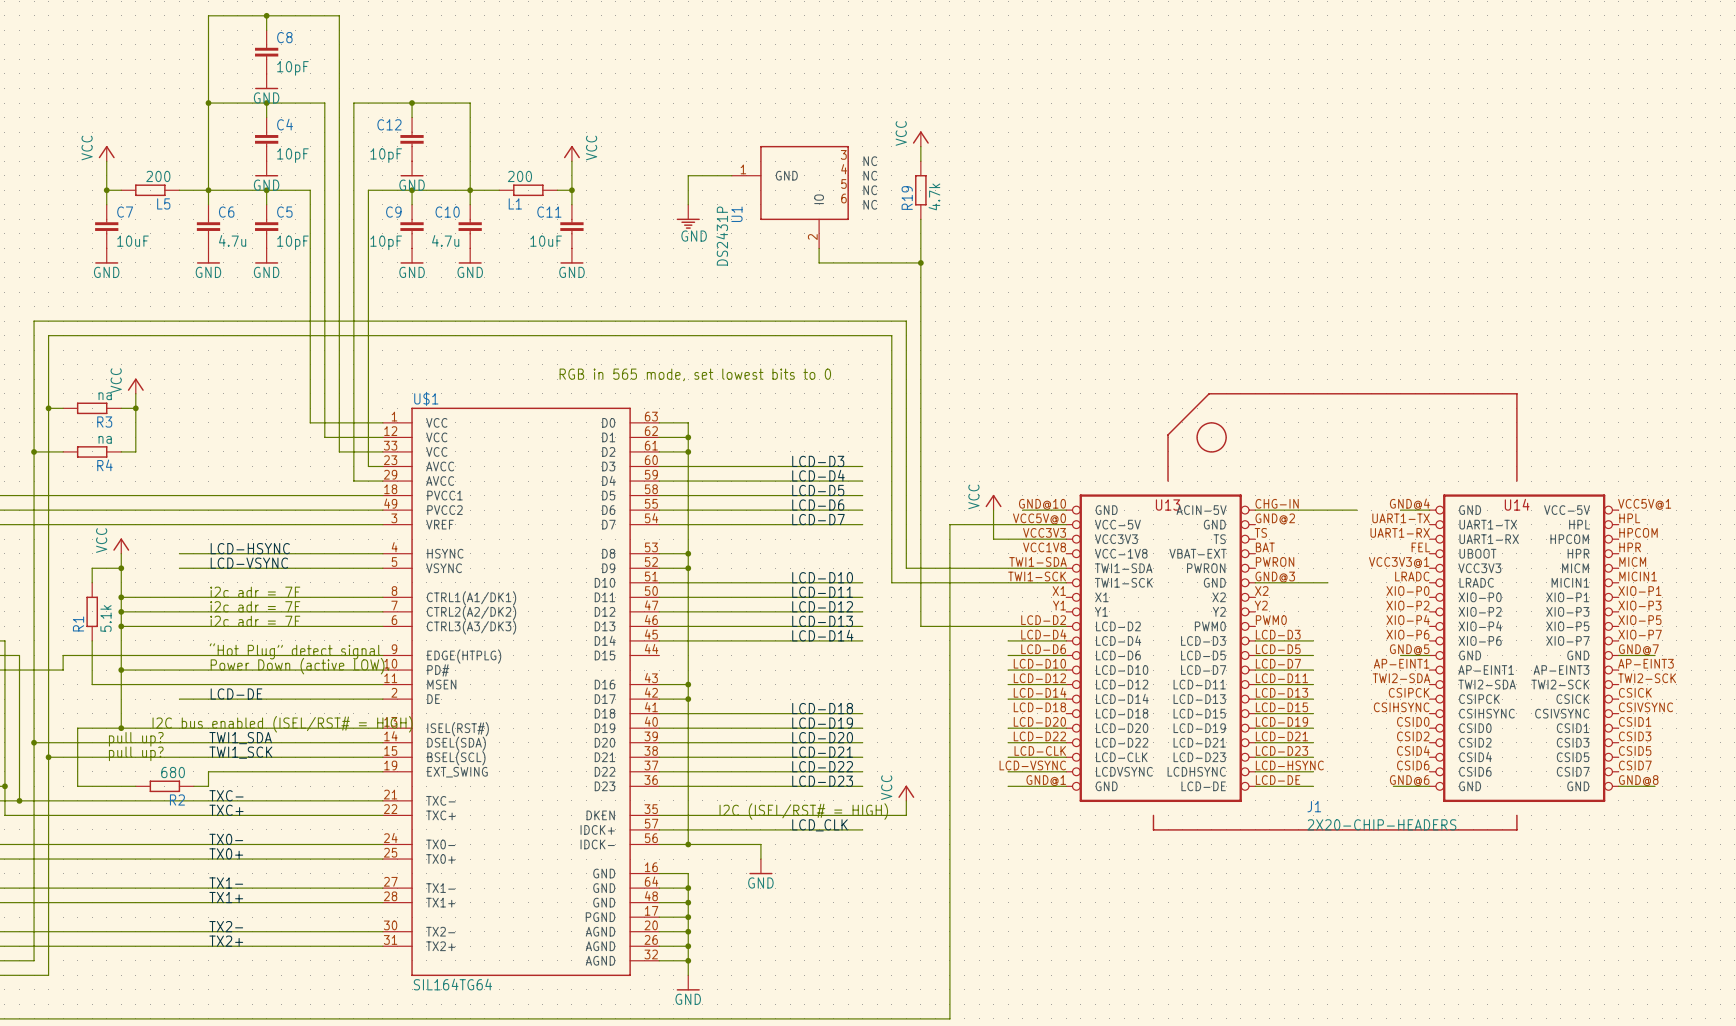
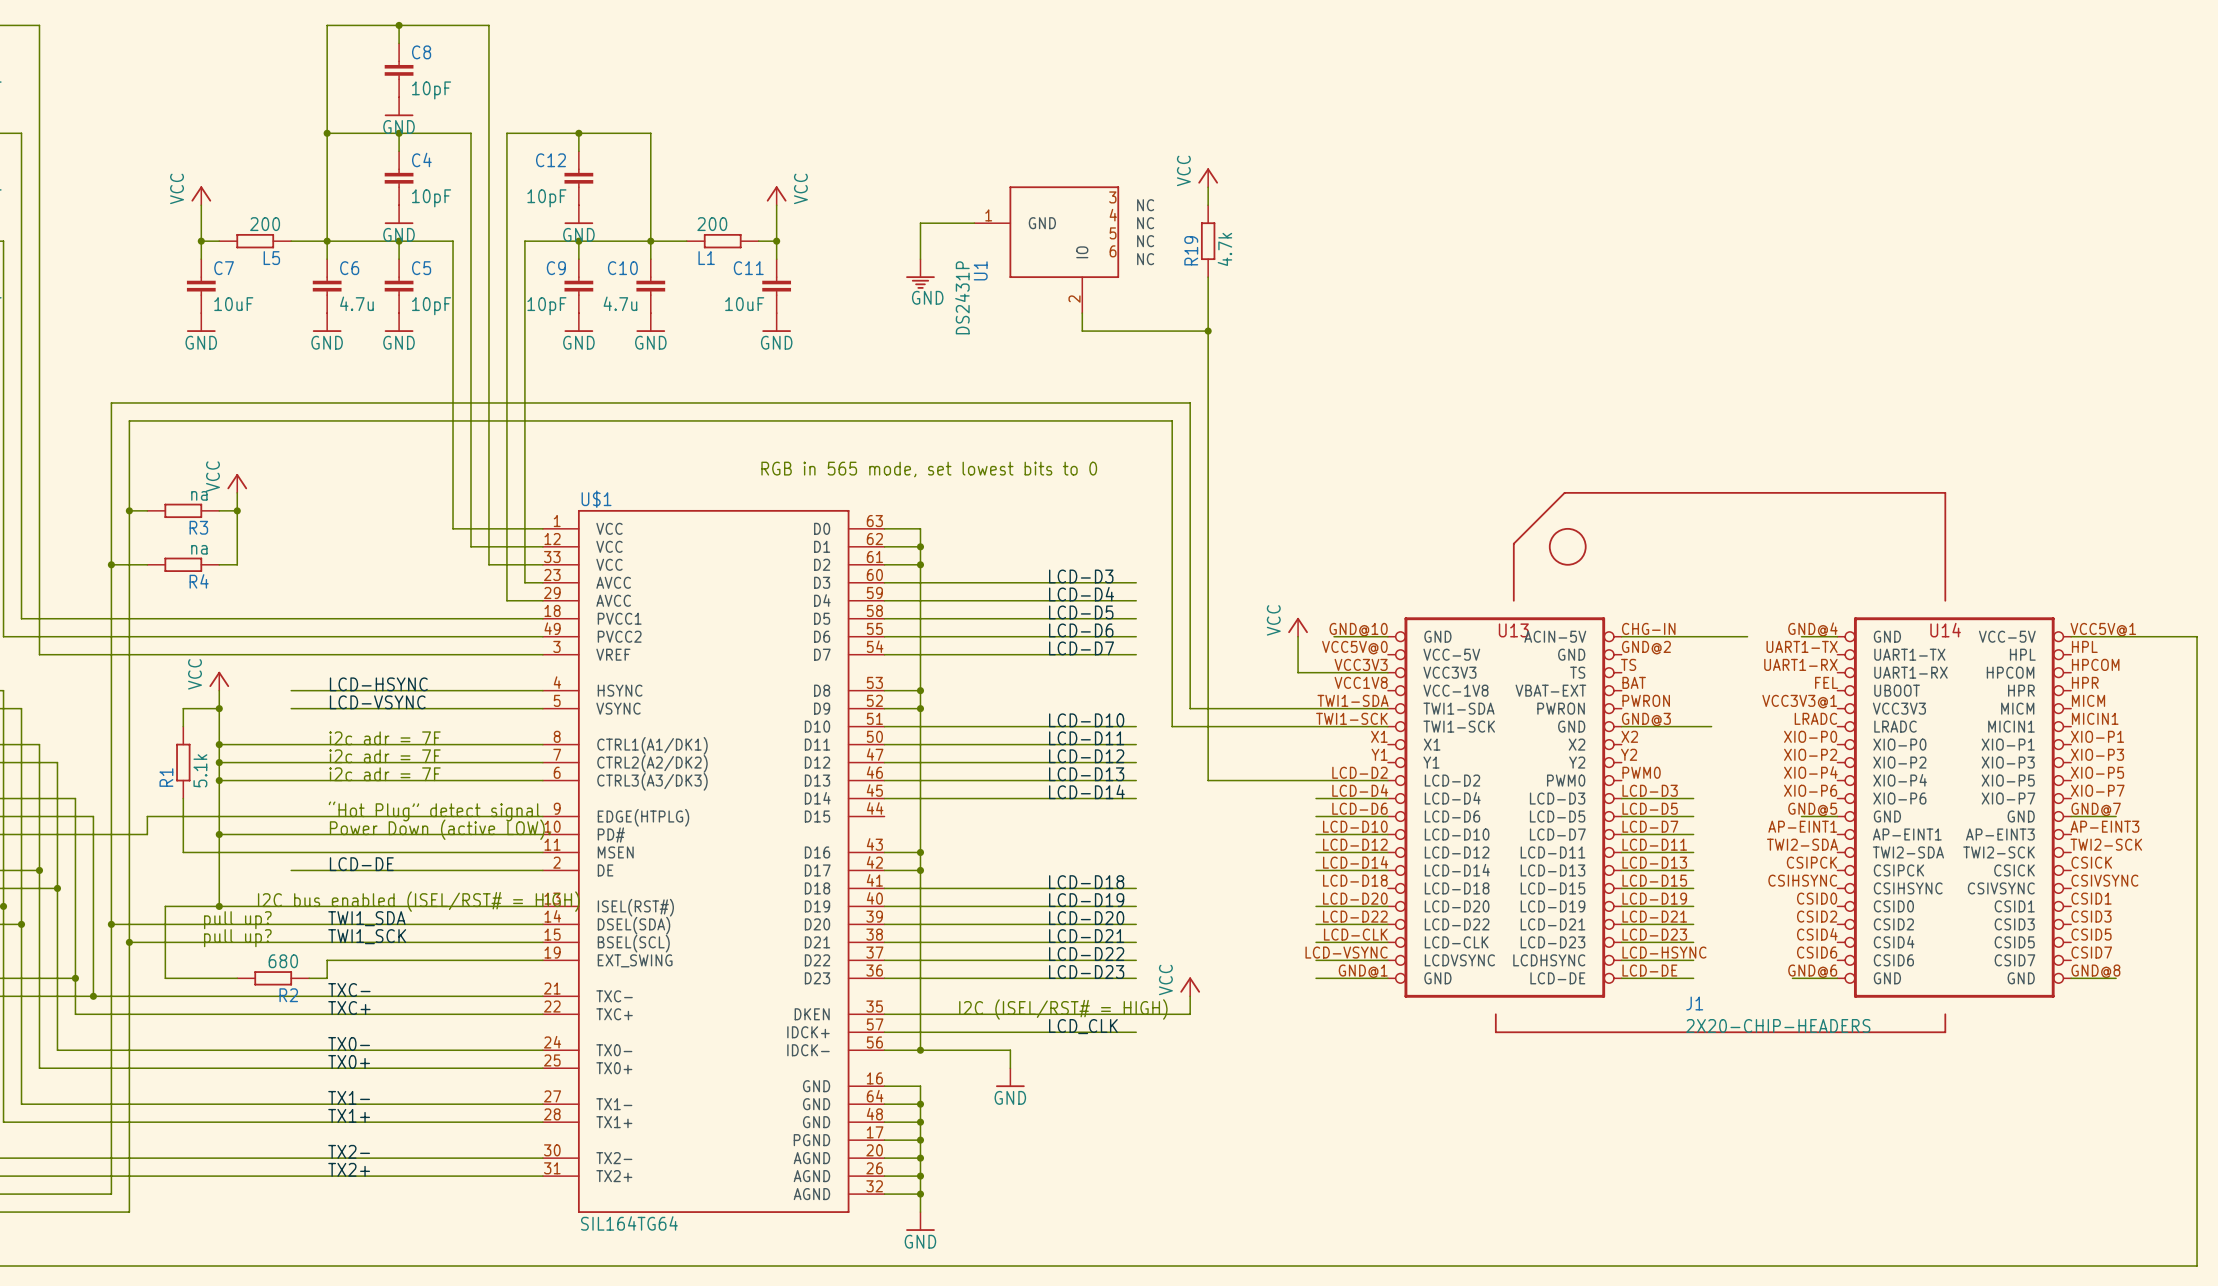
wire: (1066, 524) (949, 524) (949, 1018) -> (2071, 636) (2197, 636) (2197, 1266) (1244, 1266)

